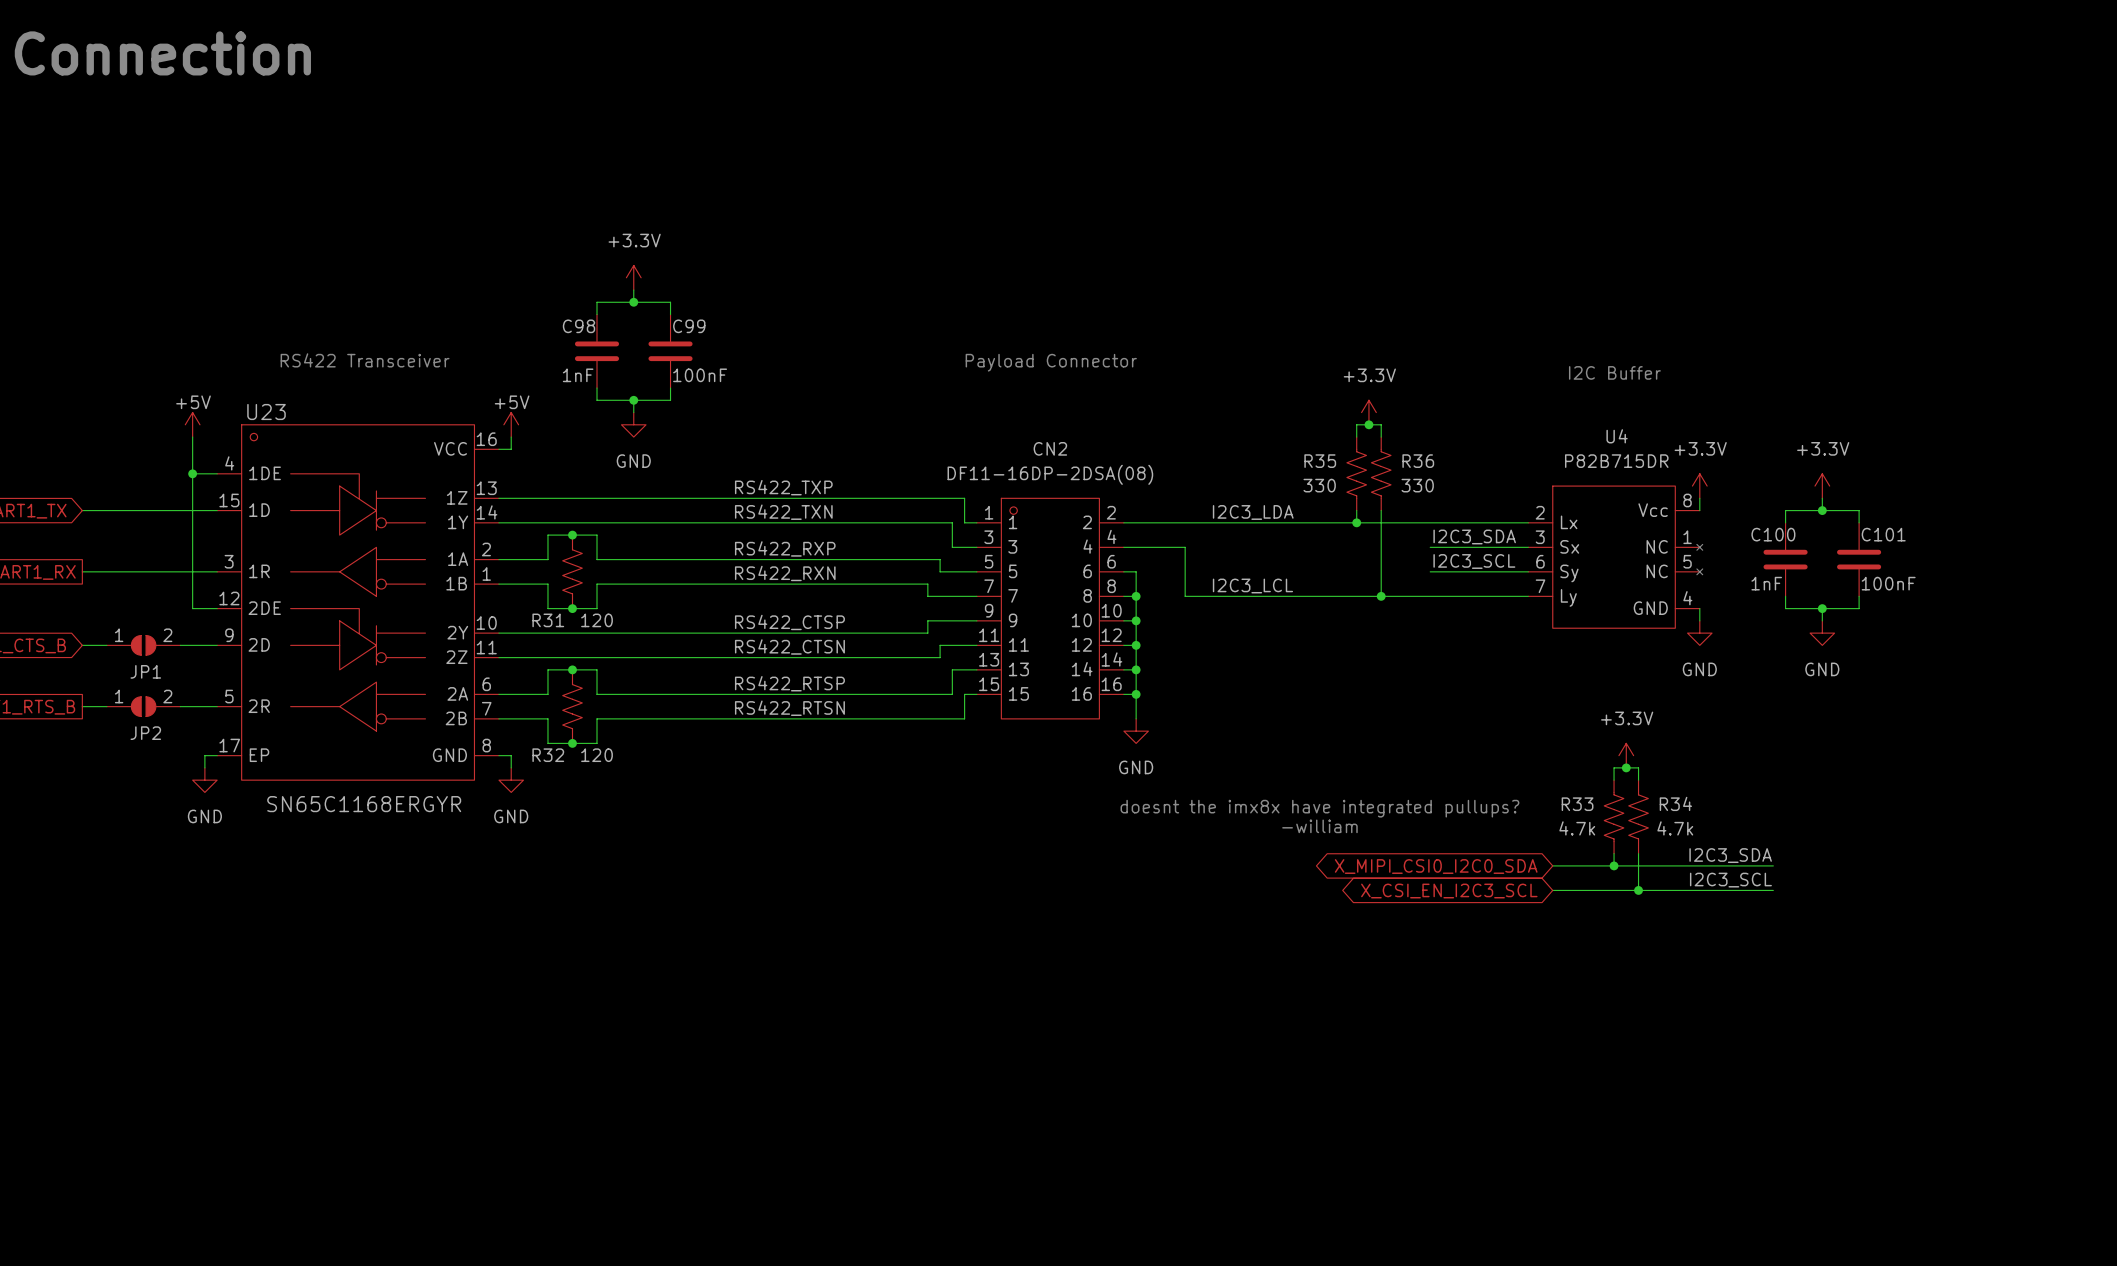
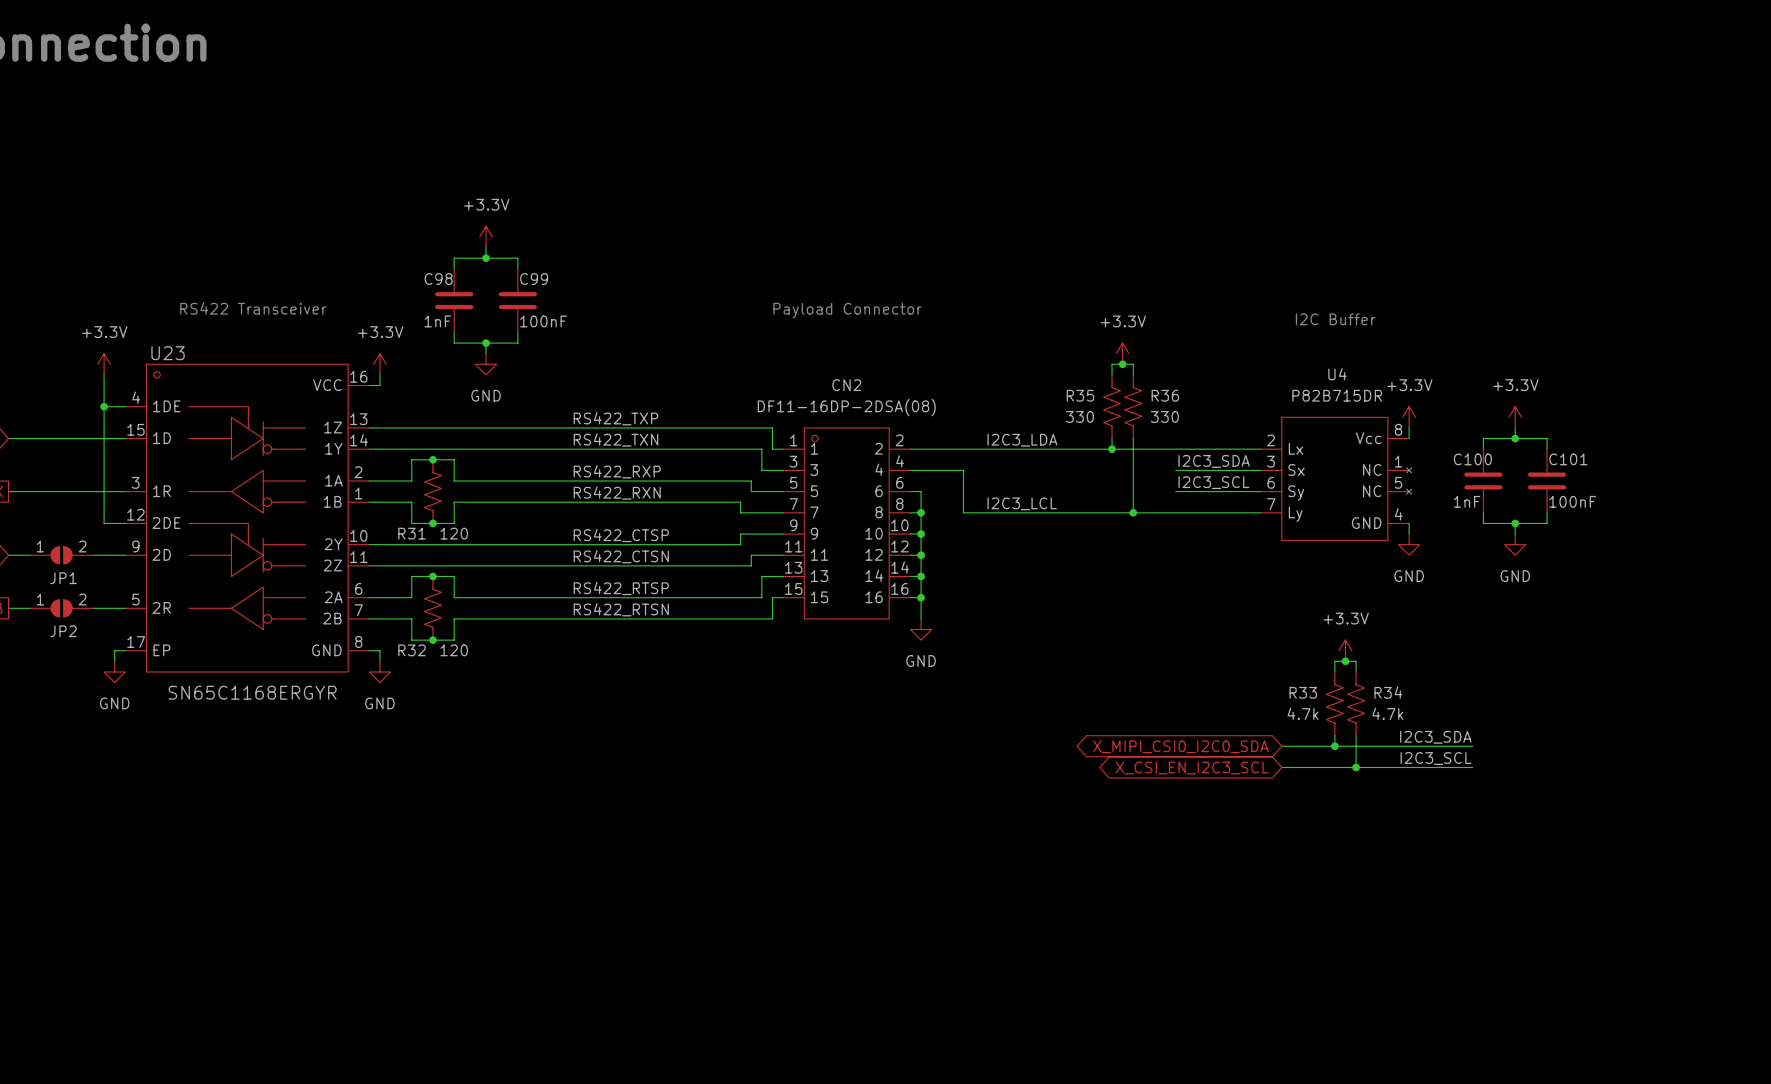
power symbol: +5V (192, 424) -> +3.3V (104, 364)
power symbol: +5V (511, 424) -> +3.3V (379, 364)
text: doesnt the imx8x have integrated pullups? (1319, 808) -> none
text: -william (1319, 826) -> none

